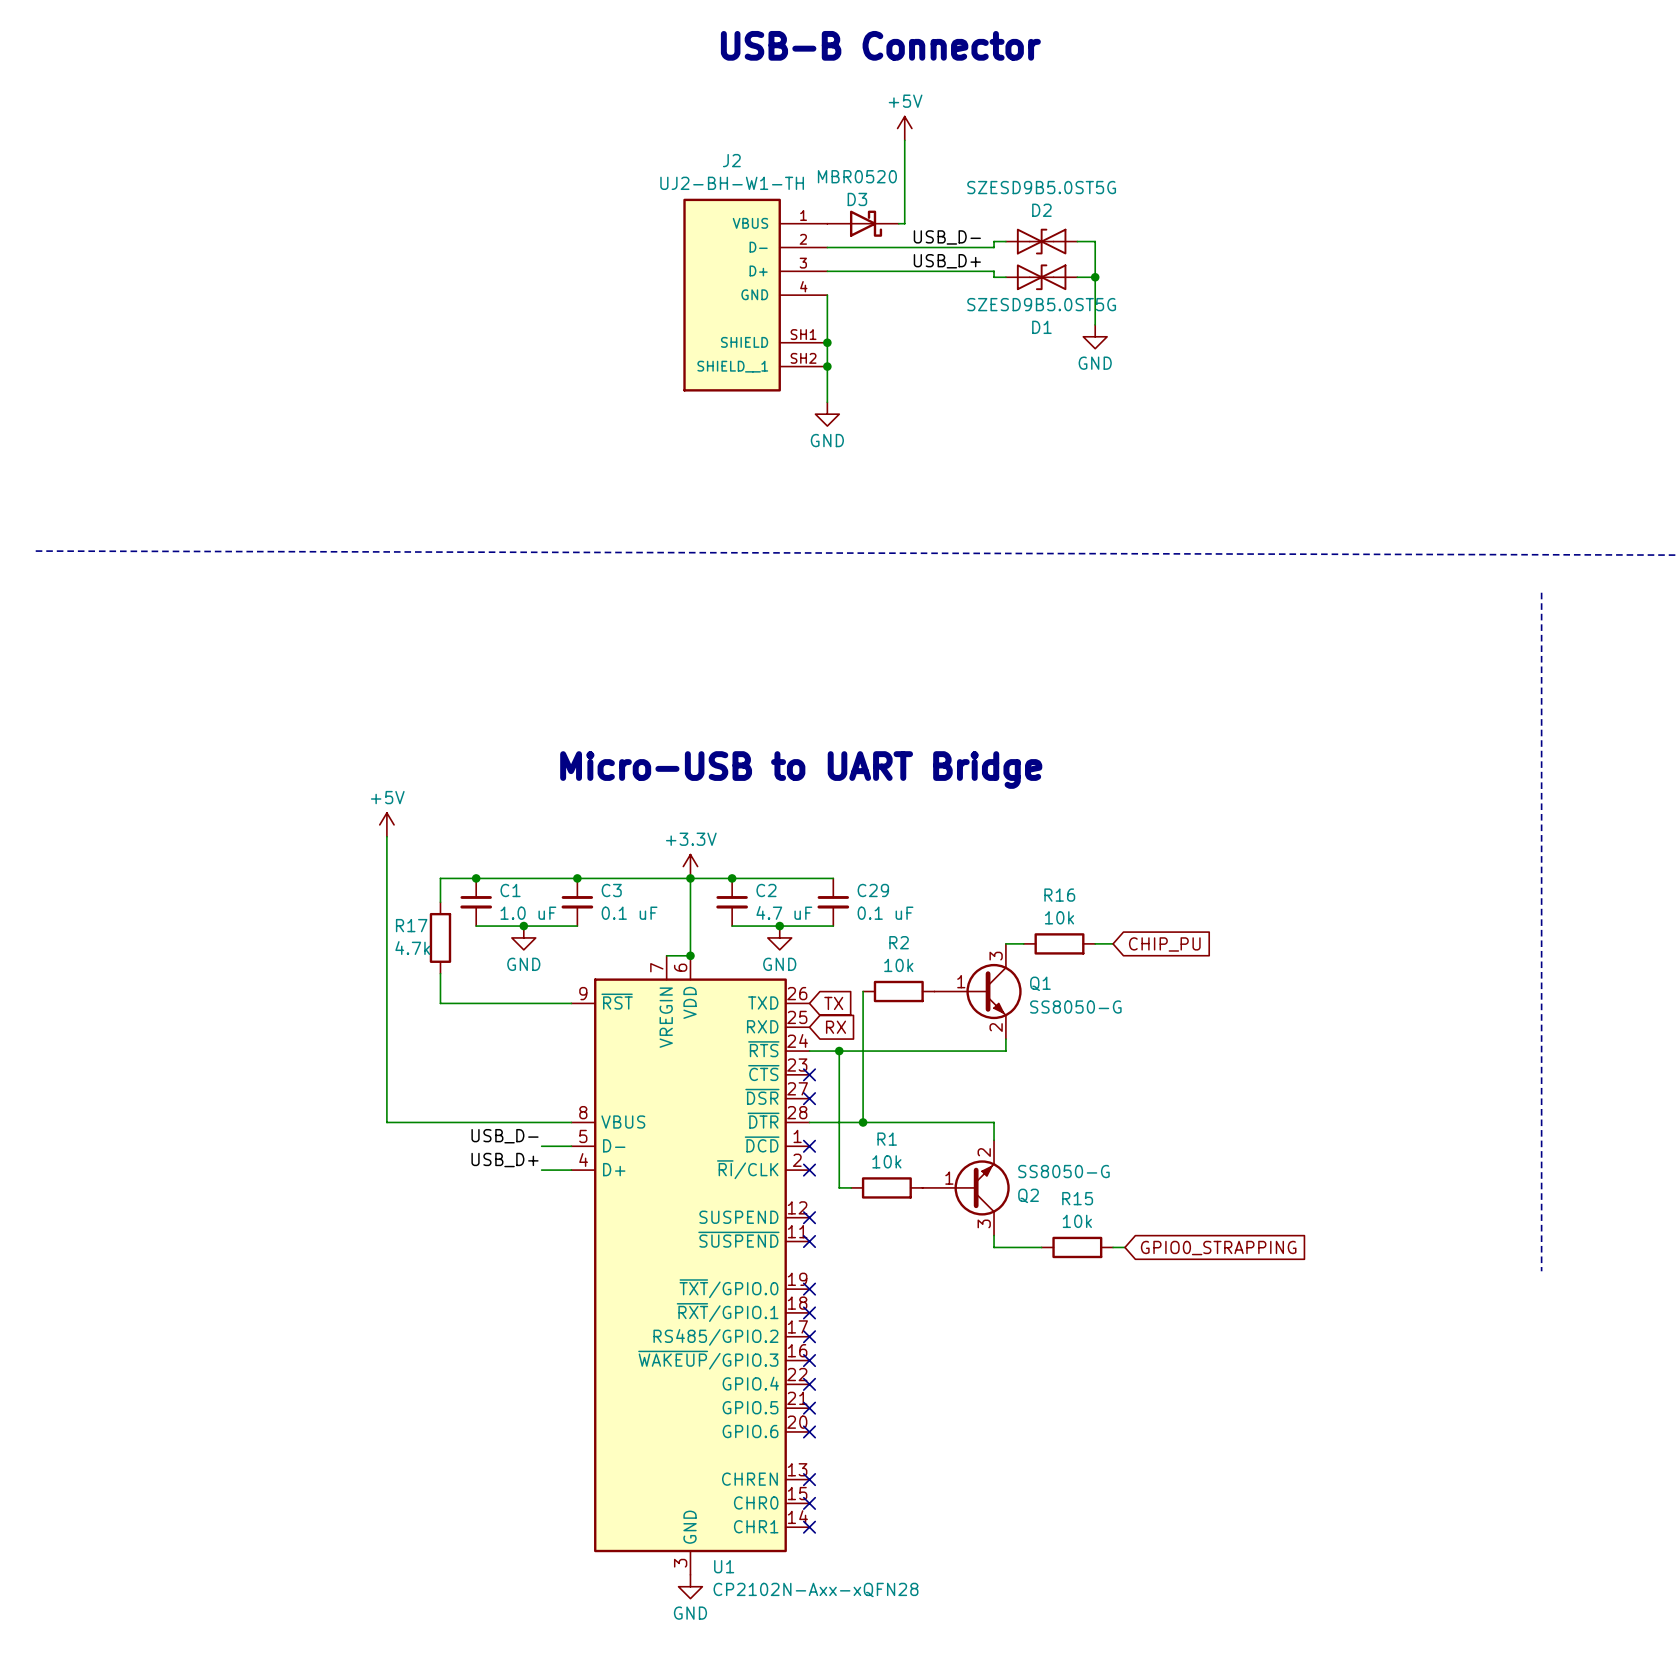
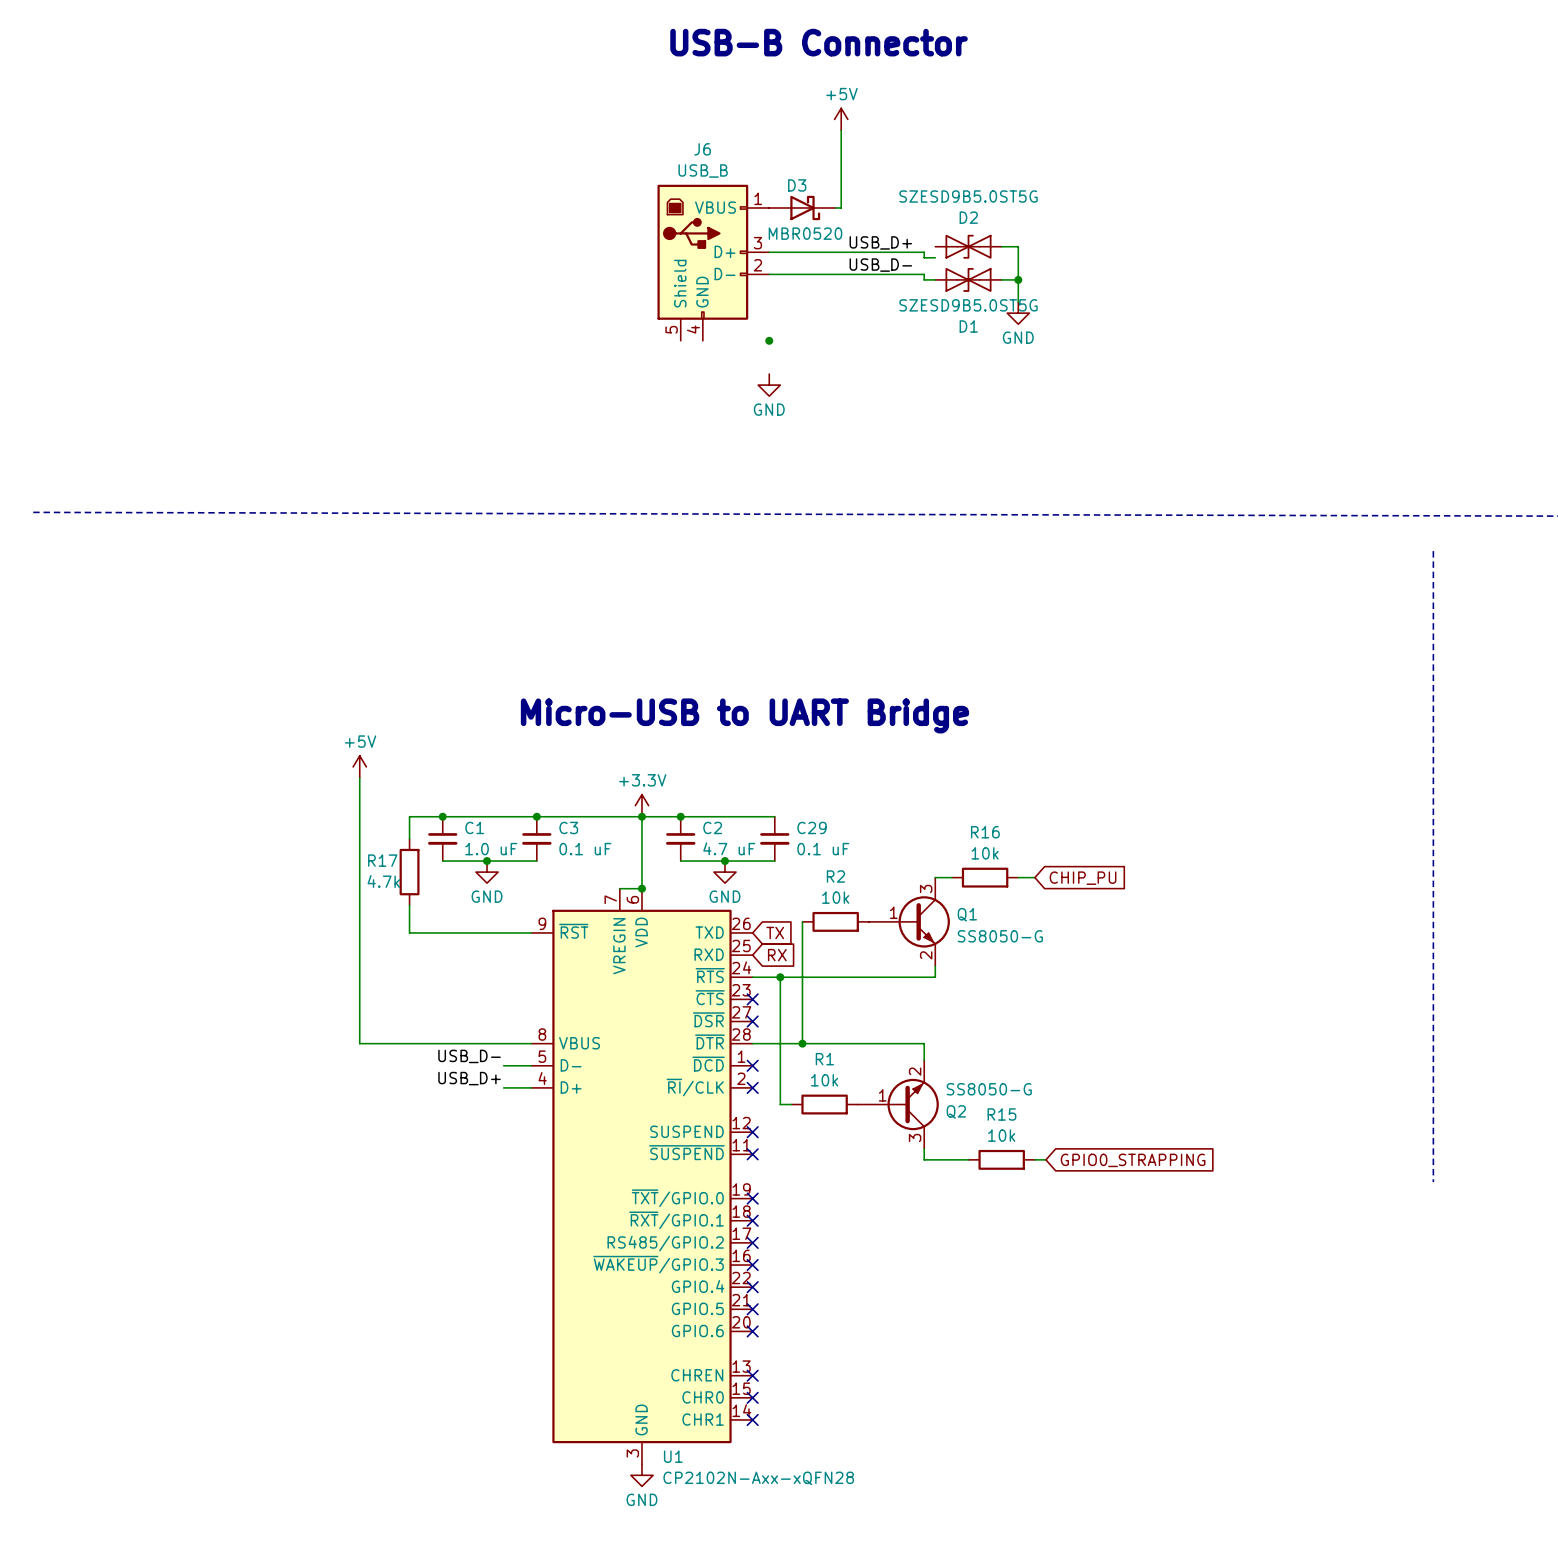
D3 value position: MBR0520 (857, 176) -> MBR0520 (805, 233)
label position: USB_D- (947, 237) -> USB_D- (880, 265)
wire: (1005, 241) (994, 241) (994, 247) (827, 247) -> none
D2 position: (1041, 241) -> (968, 246)
wire: (1077, 241) (1095, 241) (1095, 265) -> (1001, 246) (1018, 246)
D1 position: (1041, 277) -> (968, 279)
wire: (1077, 277) (1095, 277) -> (1001, 279) (1018, 279)
junction position: (1095, 277) -> (1018, 279)
J6: none -> USB_B (713, 262)
J2: UJ2-BH-W1-TH (755, 295) -> none
wire: (827, 295) (827, 402) -> (769, 274) (924, 274) (924, 279) (935, 279)
junction: (827, 342) -> none

